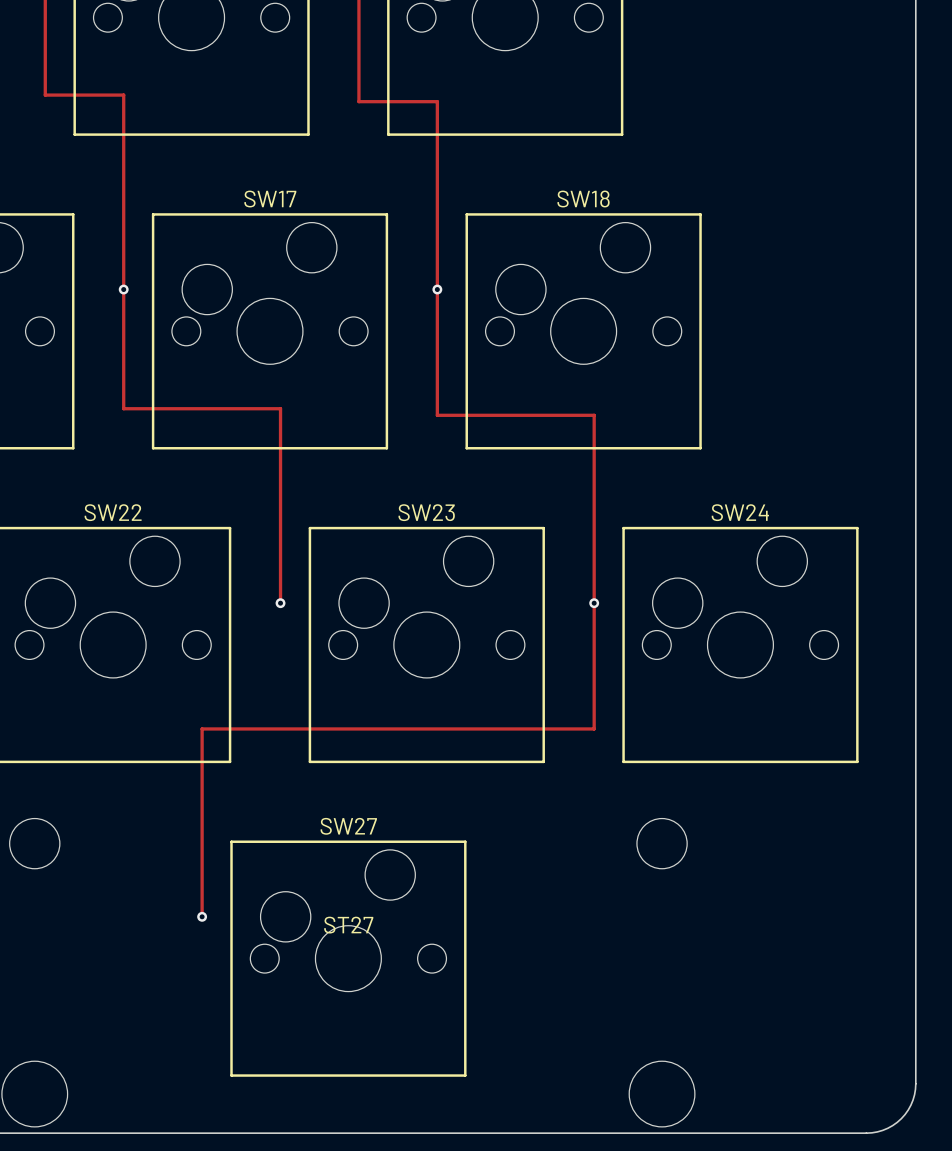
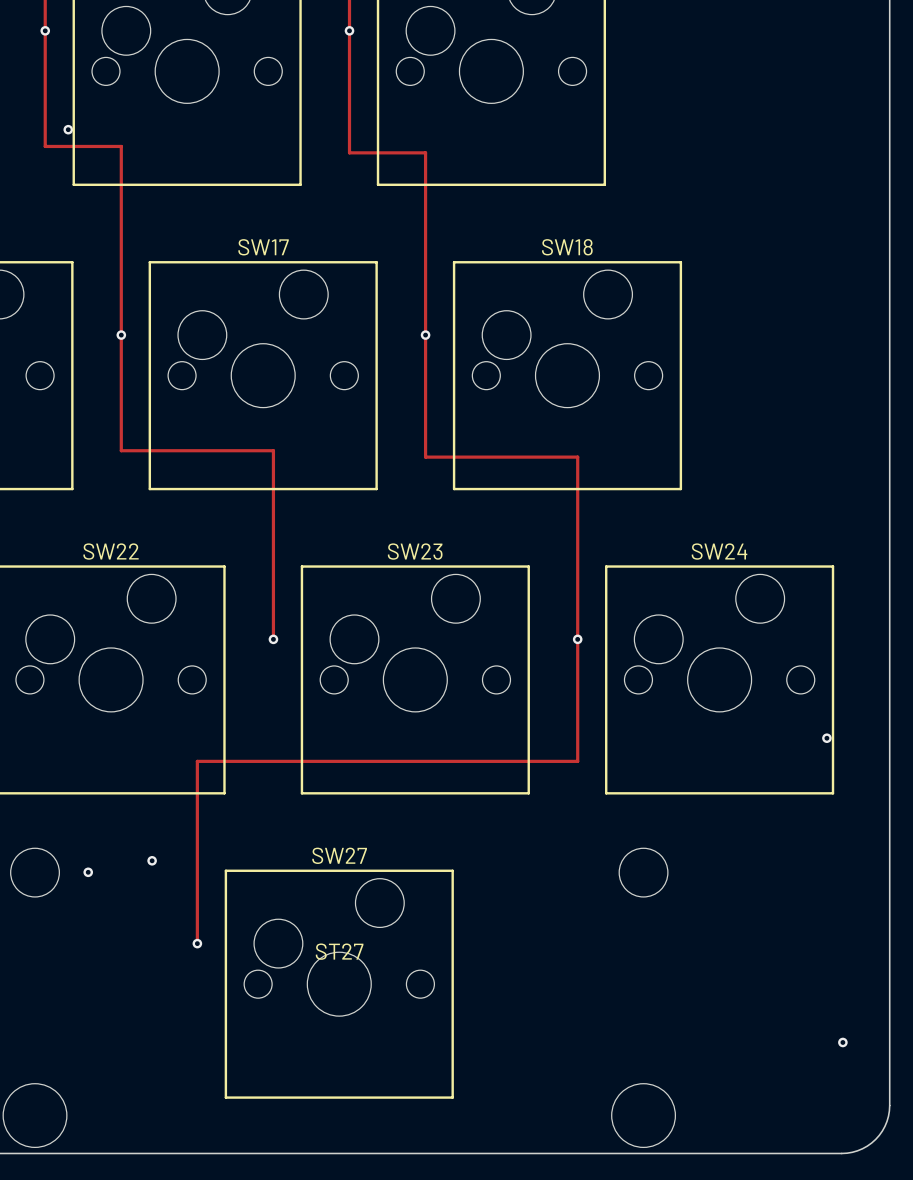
via: none -> (68, 129)
via: none -> (826, 738)
via: none -> (152, 860)
via: none -> (88, 872)
via: none -> (842, 1042)

